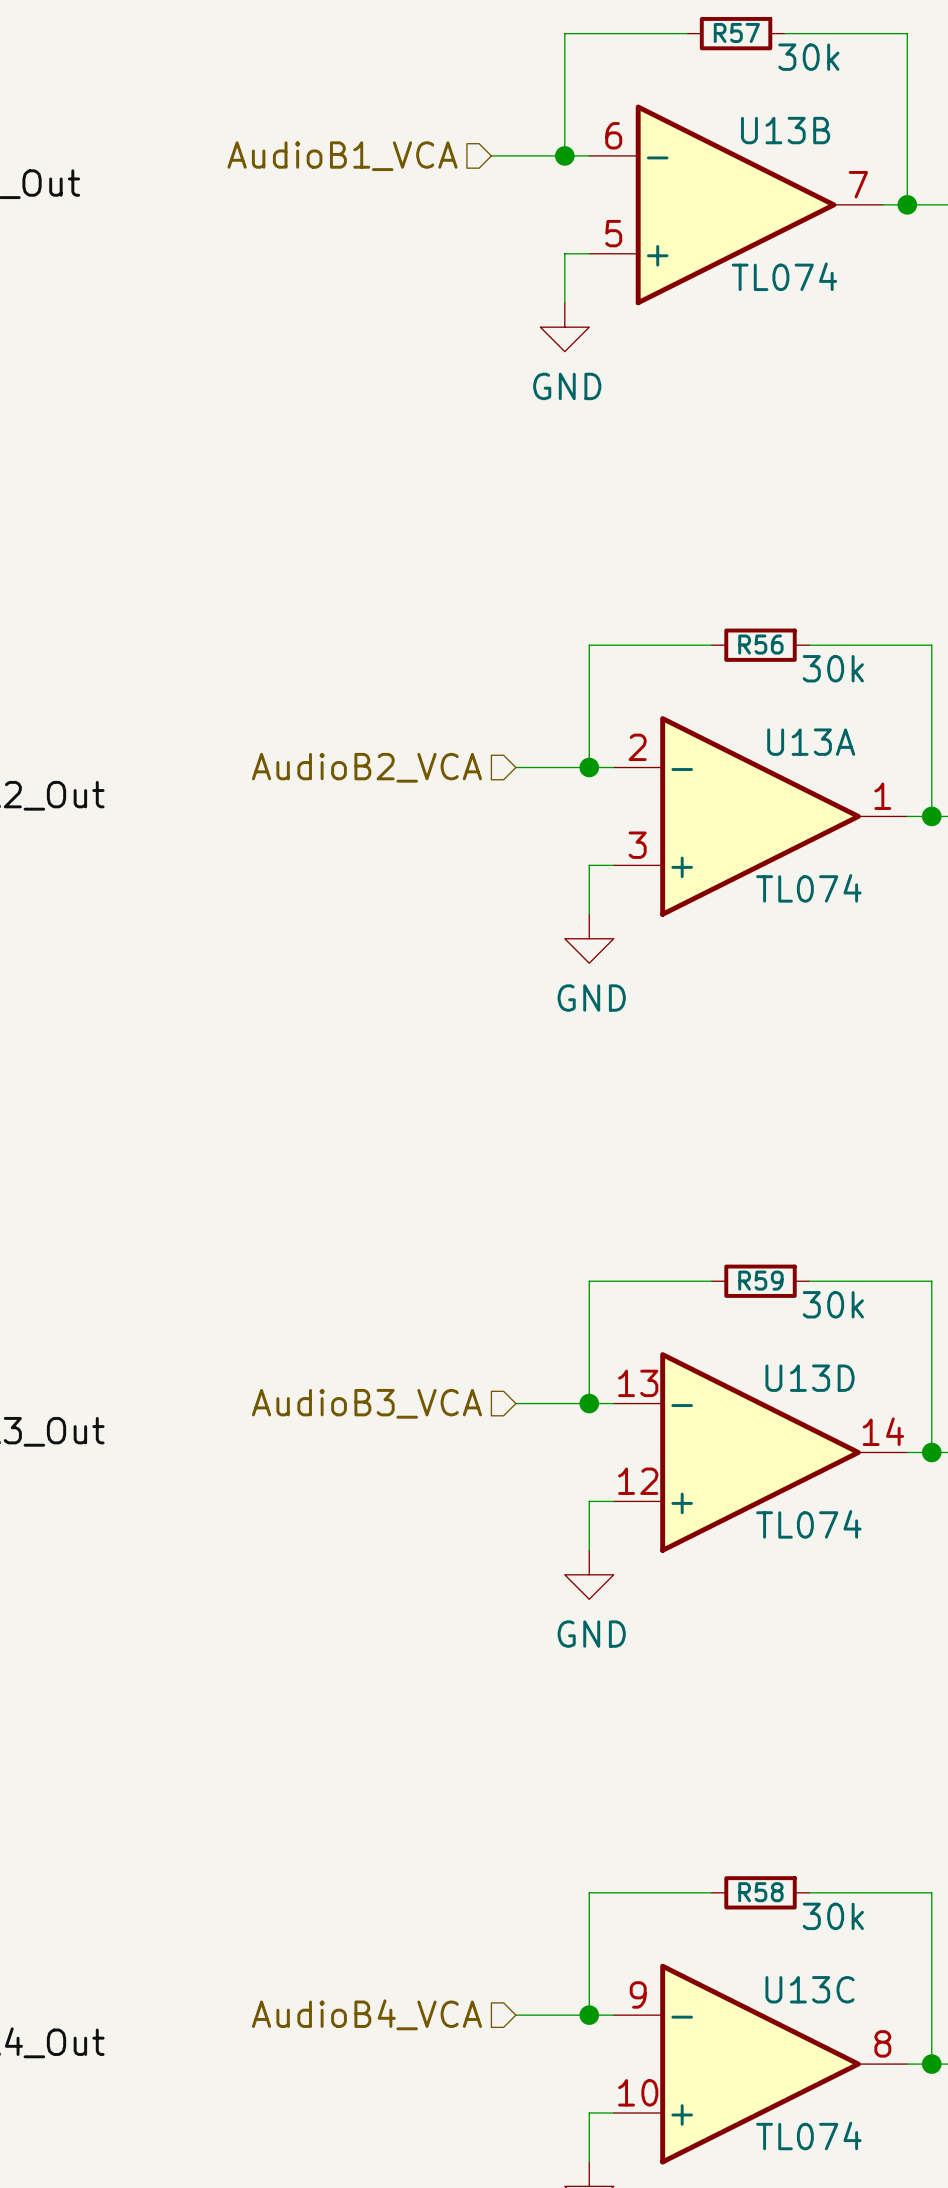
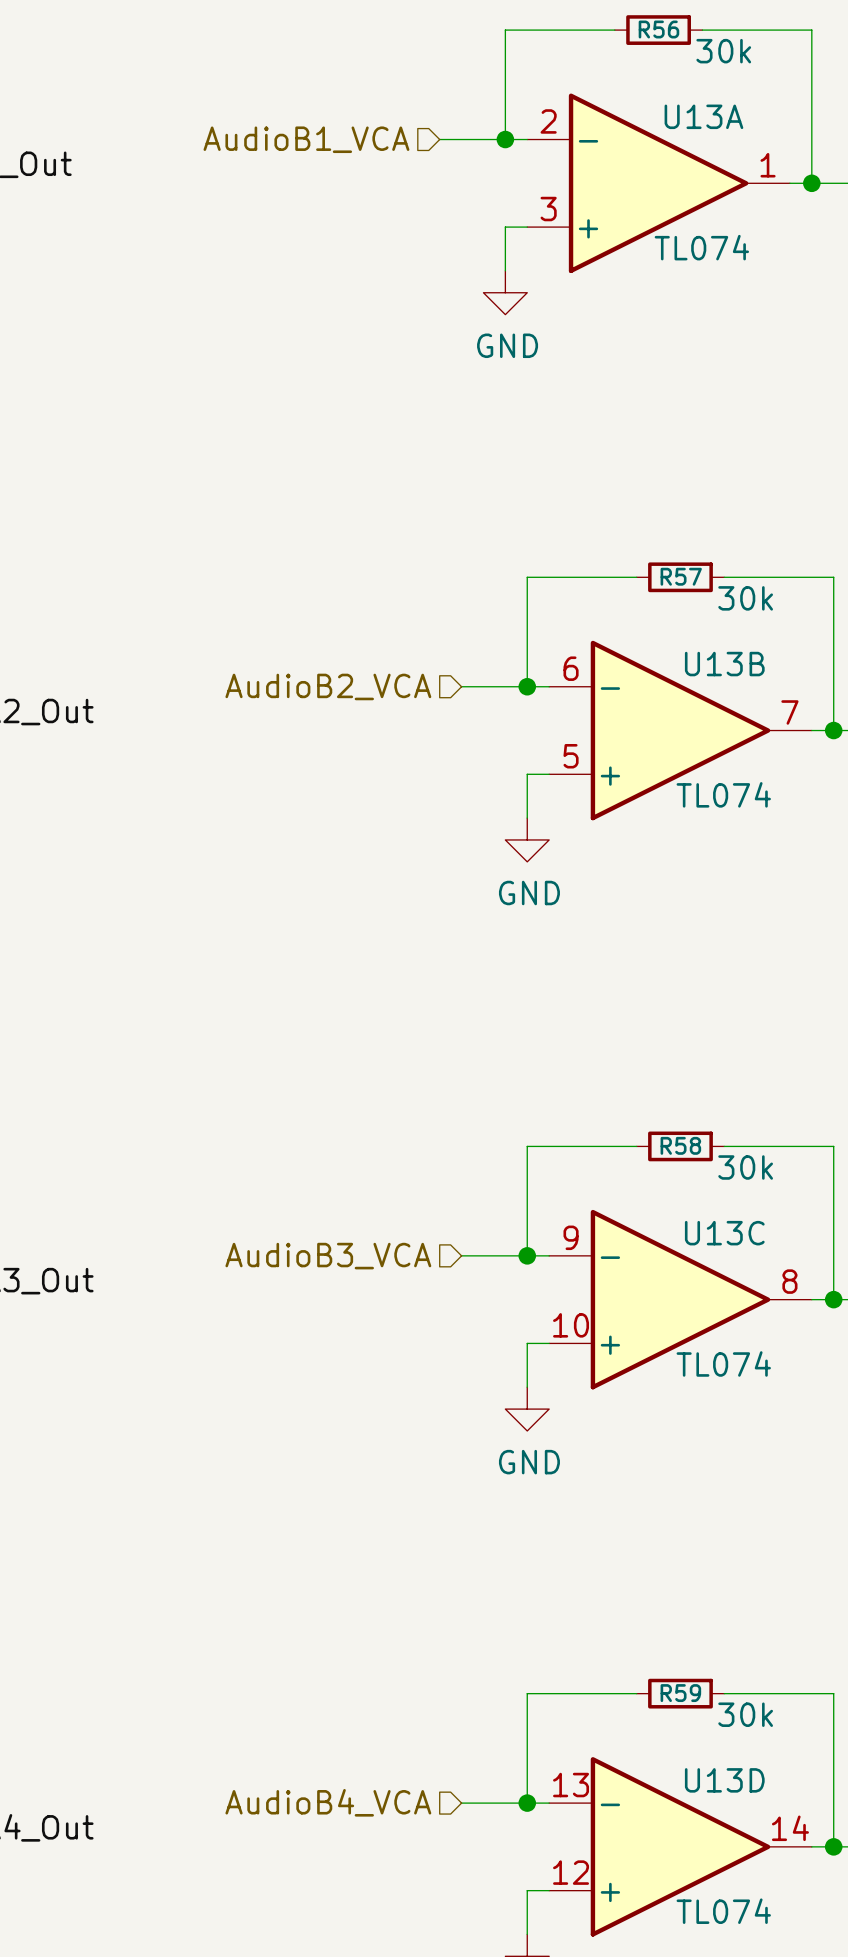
R57 name: R57 (736, 32) -> R56 (658, 29)
U13B position: (736, 204) -> (680, 730)
R56 name: R56 (760, 644) -> R57 (681, 576)
U13A position: (760, 816) -> (658, 183)
R59 name: R59 (760, 1280) -> R58 (680, 1145)
U13D position: (760, 1452) -> (680, 1846)
R58 name: R58 (760, 1892) -> R59 (680, 1693)
U13C position: (760, 2064) -> (680, 1299)

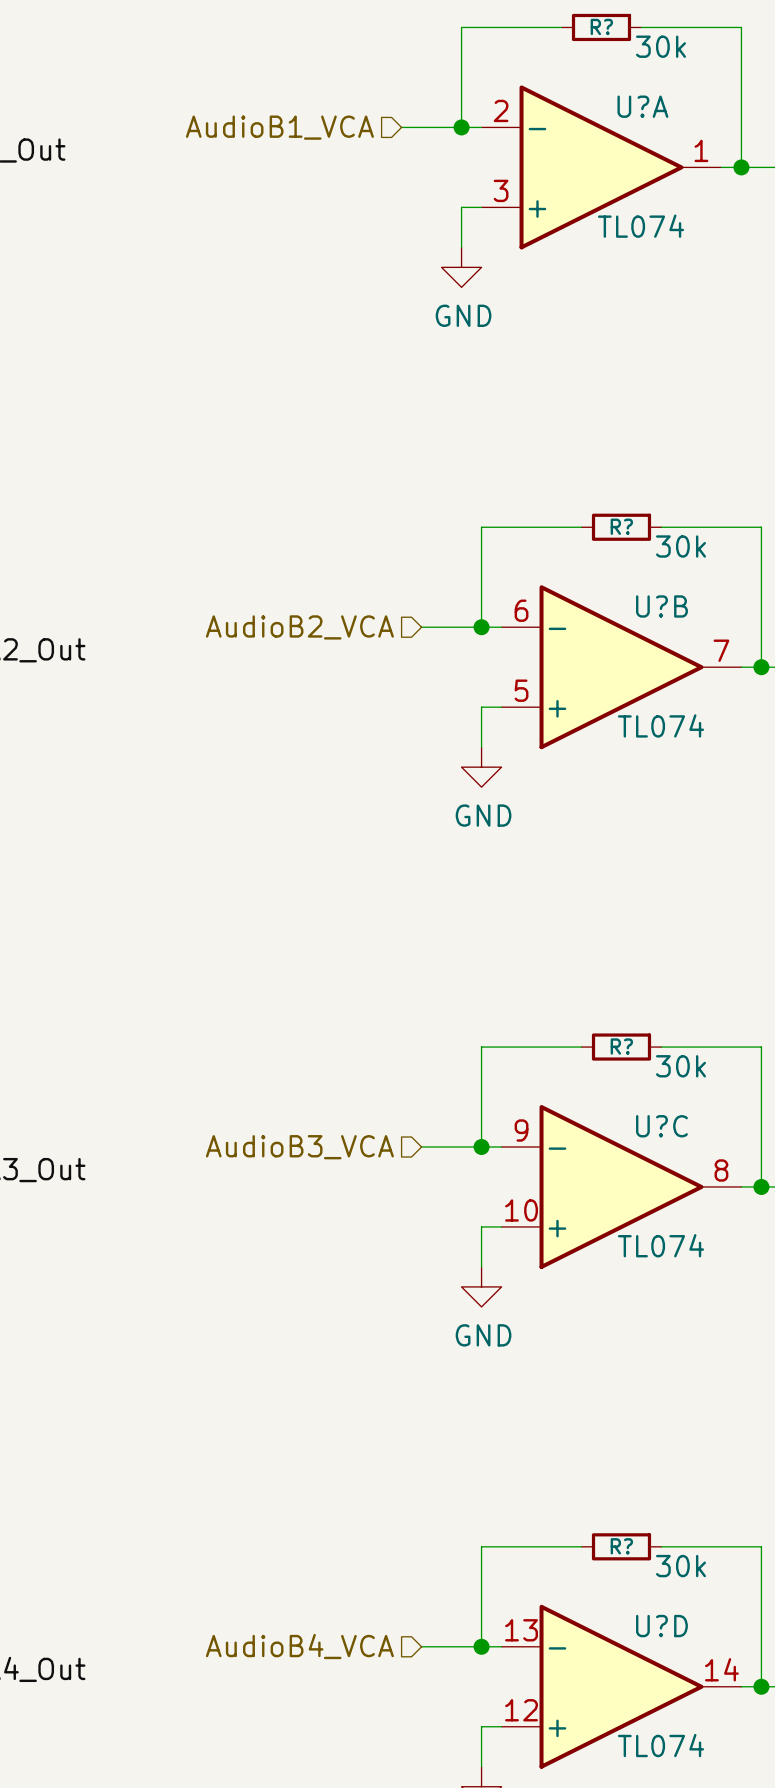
R56 name: R56 (658, 29) -> R? (601, 26)
U13A name: U13A (703, 116) -> U?A (642, 106)
R57 name: R57 (681, 576) -> R? (621, 526)
U13B name: U13B (724, 664) -> U?B (661, 606)
R58 name: R58 (680, 1145) -> R? (621, 1046)
U13C name: U13C (724, 1233) -> U?C (661, 1126)
R59 name: R59 (680, 1693) -> R? (621, 1546)
U13D name: U13D (724, 1780) -> U?D (661, 1626)

